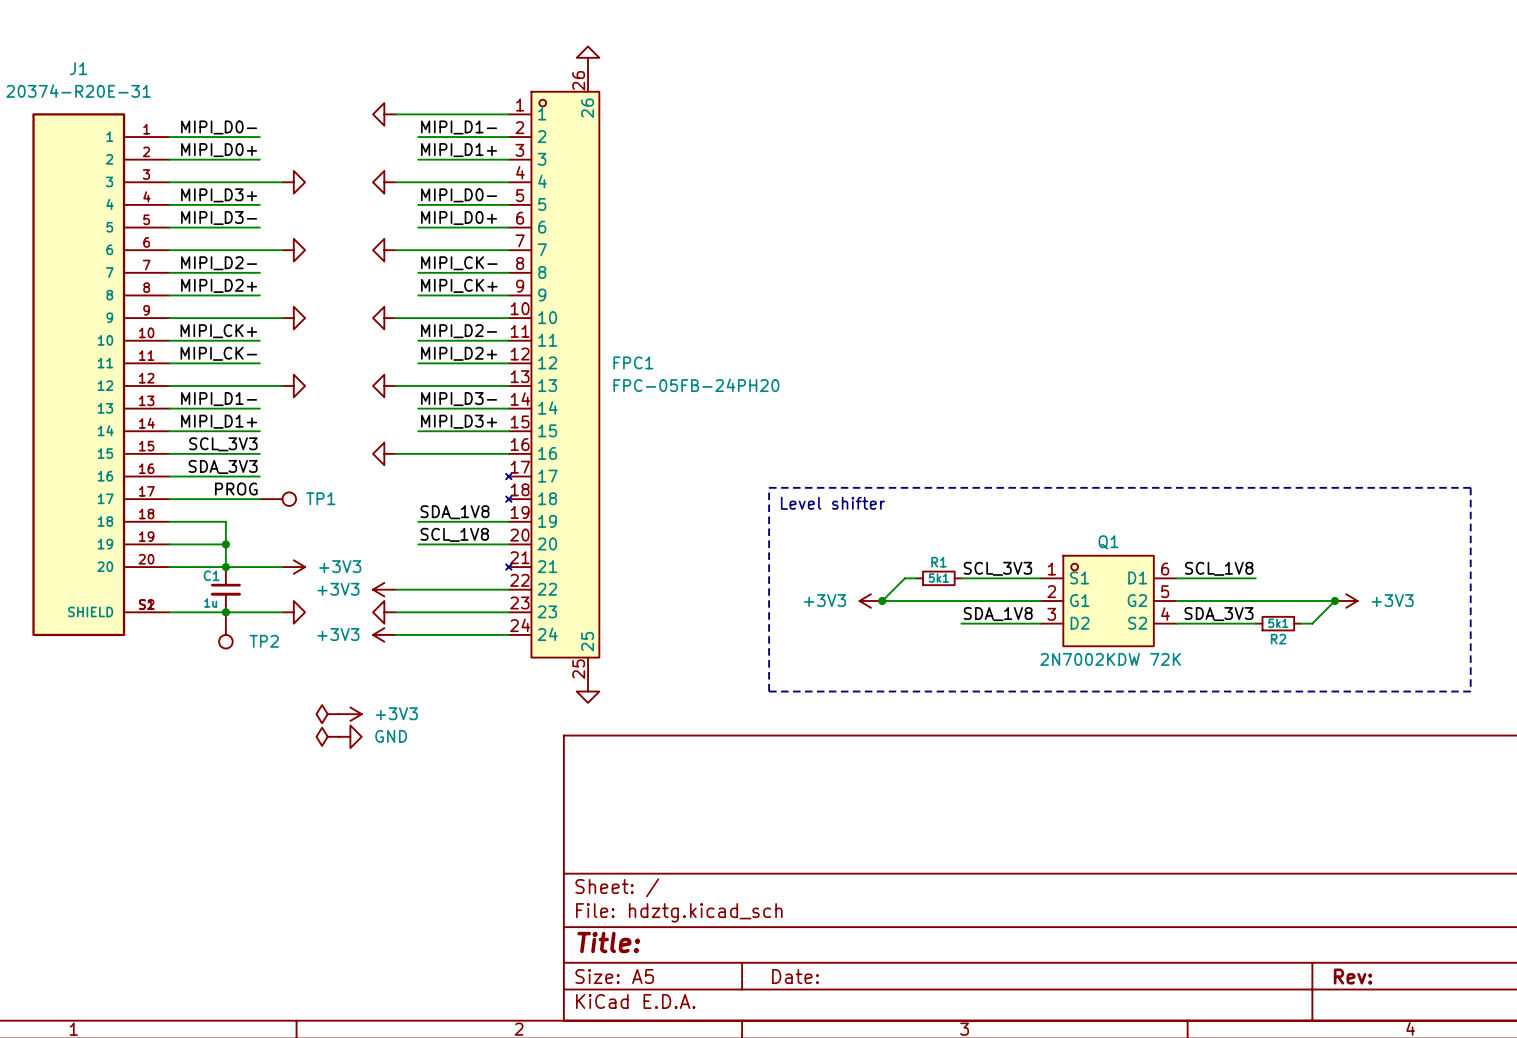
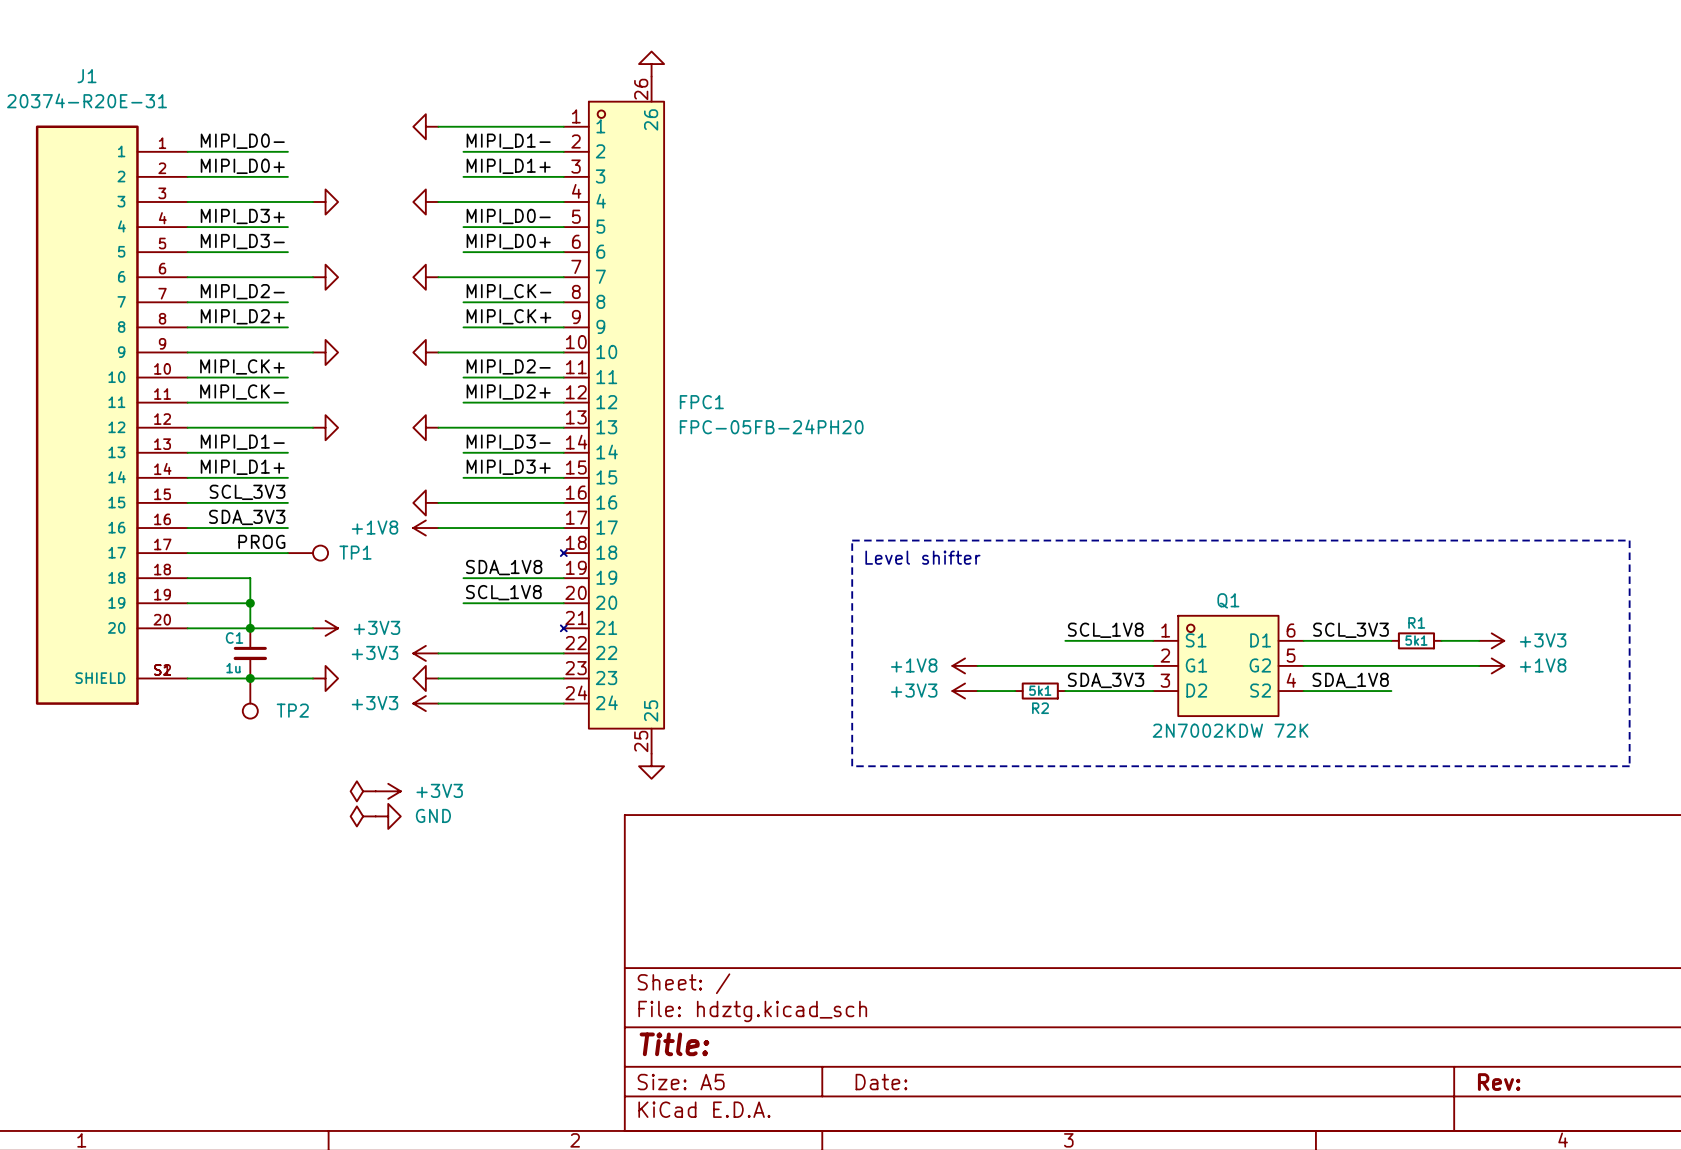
FPC1 symbol: [506, 69, 600, 681] -> [560, 76, 665, 754]
power symbol: none -> +1V8 (425, 528)
wire: none -> (438, 528) (563, 528)
label: SCL_3V3 (997, 568) -> SCL_1V8 (1105, 630)
label: SCL_1V8 (1219, 568) -> SCL_3V3 (1350, 630)
wire: (916, 578) (904, 578) (882, 601) -> none
R1 position: (938, 578) -> (1416, 640)
wire: none -> (1441, 640) (1479, 640)
power symbol: none -> +3V3 (1491, 640)
power symbol: +3V3 (870, 601) -> +1V8 (965, 665)
junction: (882, 601) -> none
wire: (1334, 601) (1312, 623) (1300, 623) -> none
junction: (1334, 601) -> none
power symbol: +3V3 (1346, 601) -> +1V8 (1491, 665)
label: SDA_1V8 (998, 614) -> SDA_3V3 (1106, 680)
label: SDA_3V3 (1218, 614) -> SDA_1V8 (1350, 680)
power symbol: none -> +3V3 (965, 691)
wire: none -> (977, 691) (1015, 691)
R2 position: (1278, 623) -> (1040, 691)

